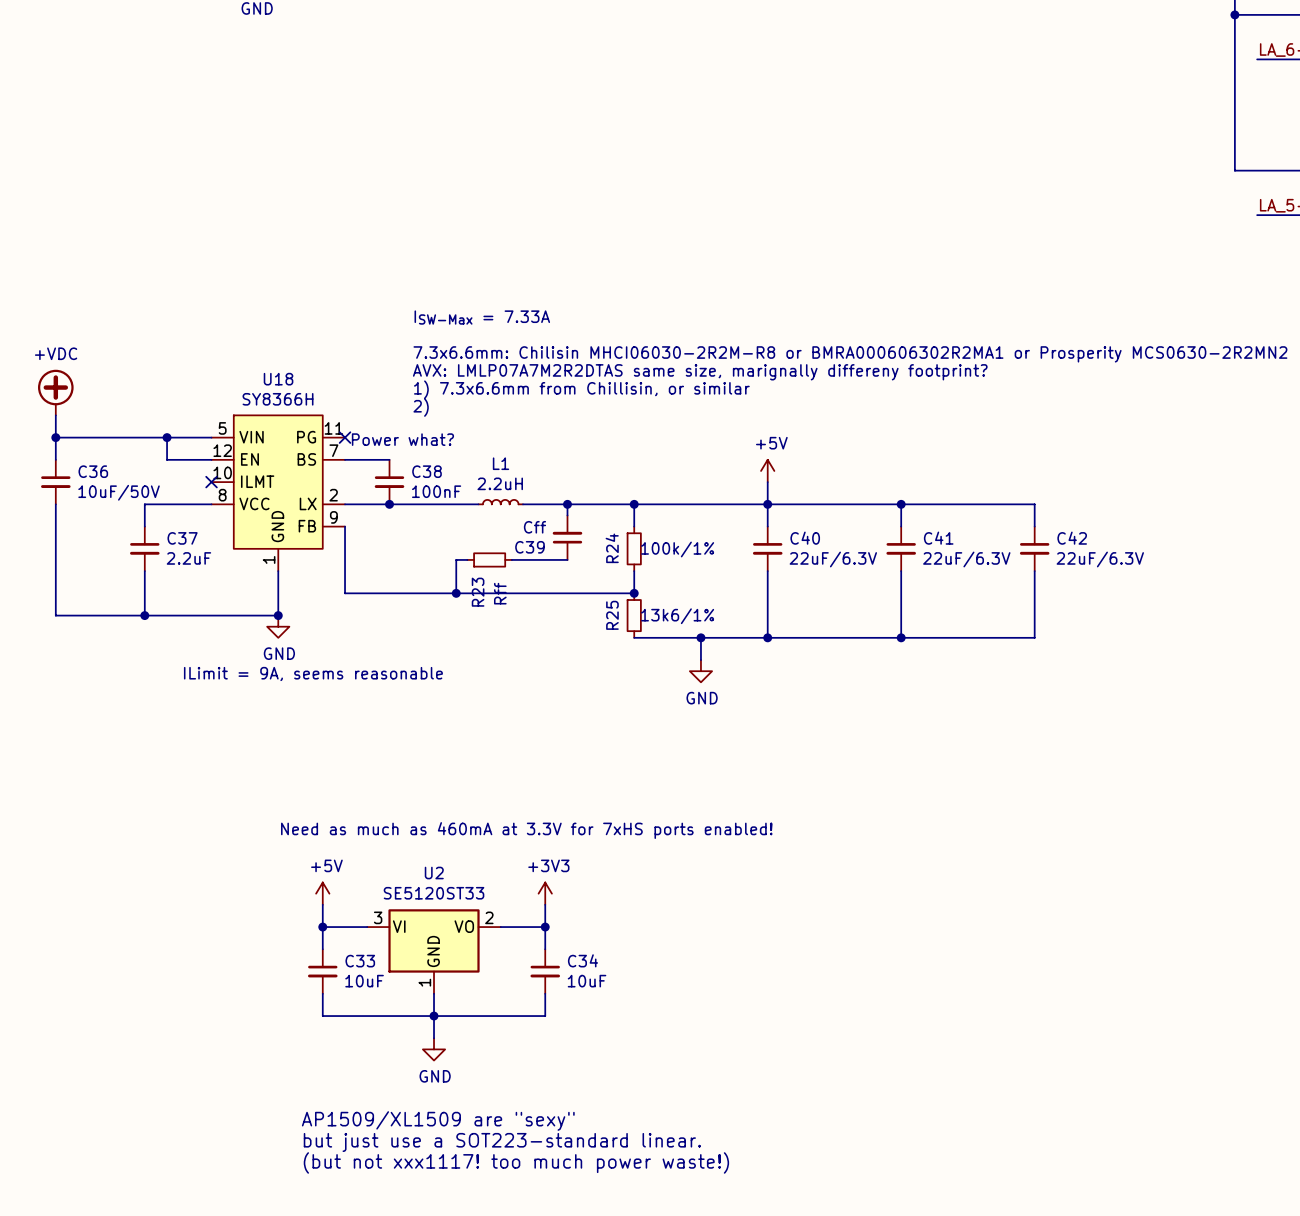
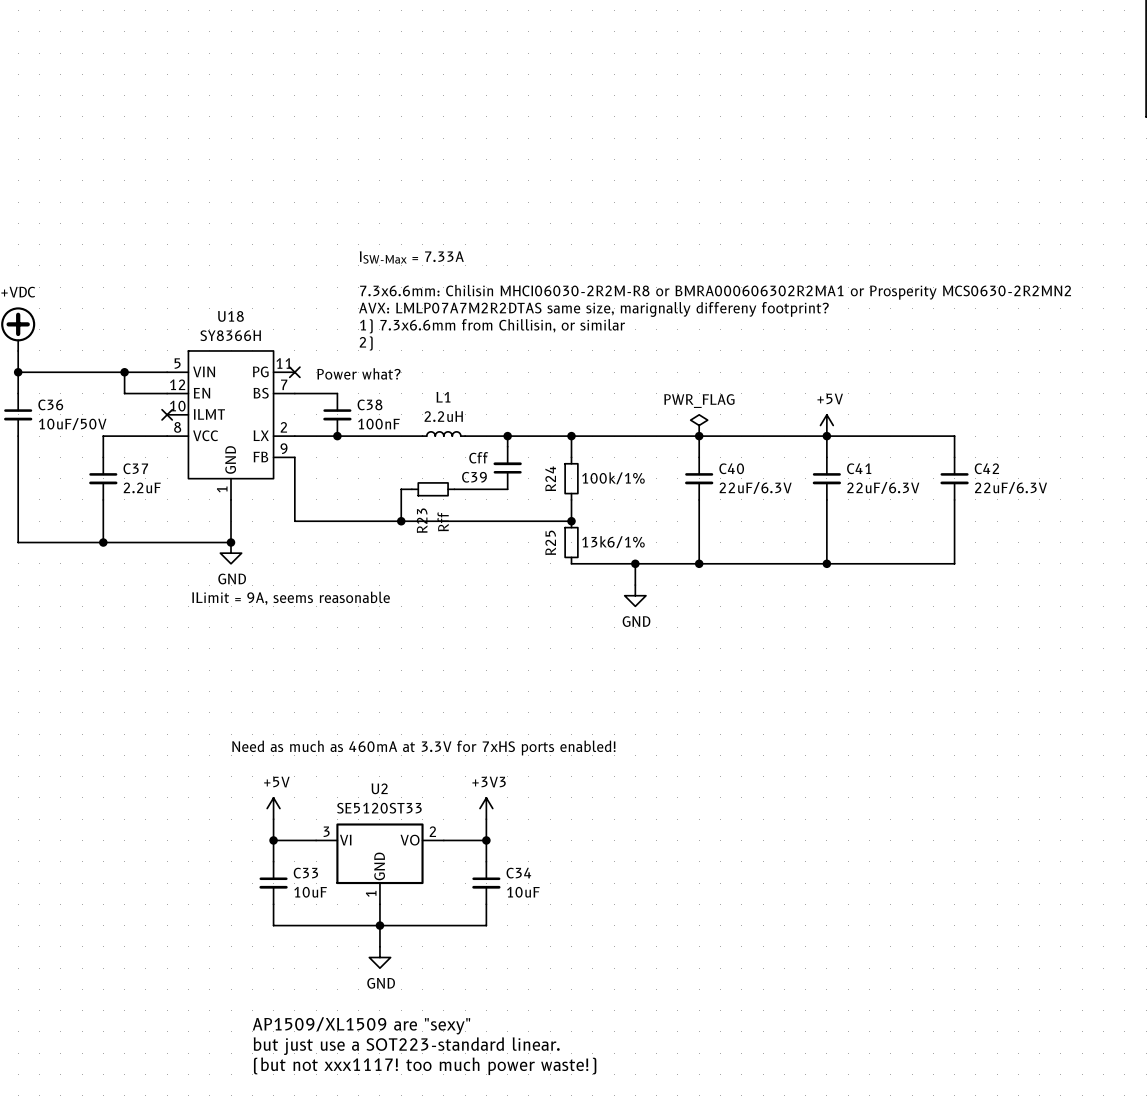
power symbol position: +5V (767, 470) -> +5V (826, 425)
power symbol: none -> PWR_FLAG (699, 425)

